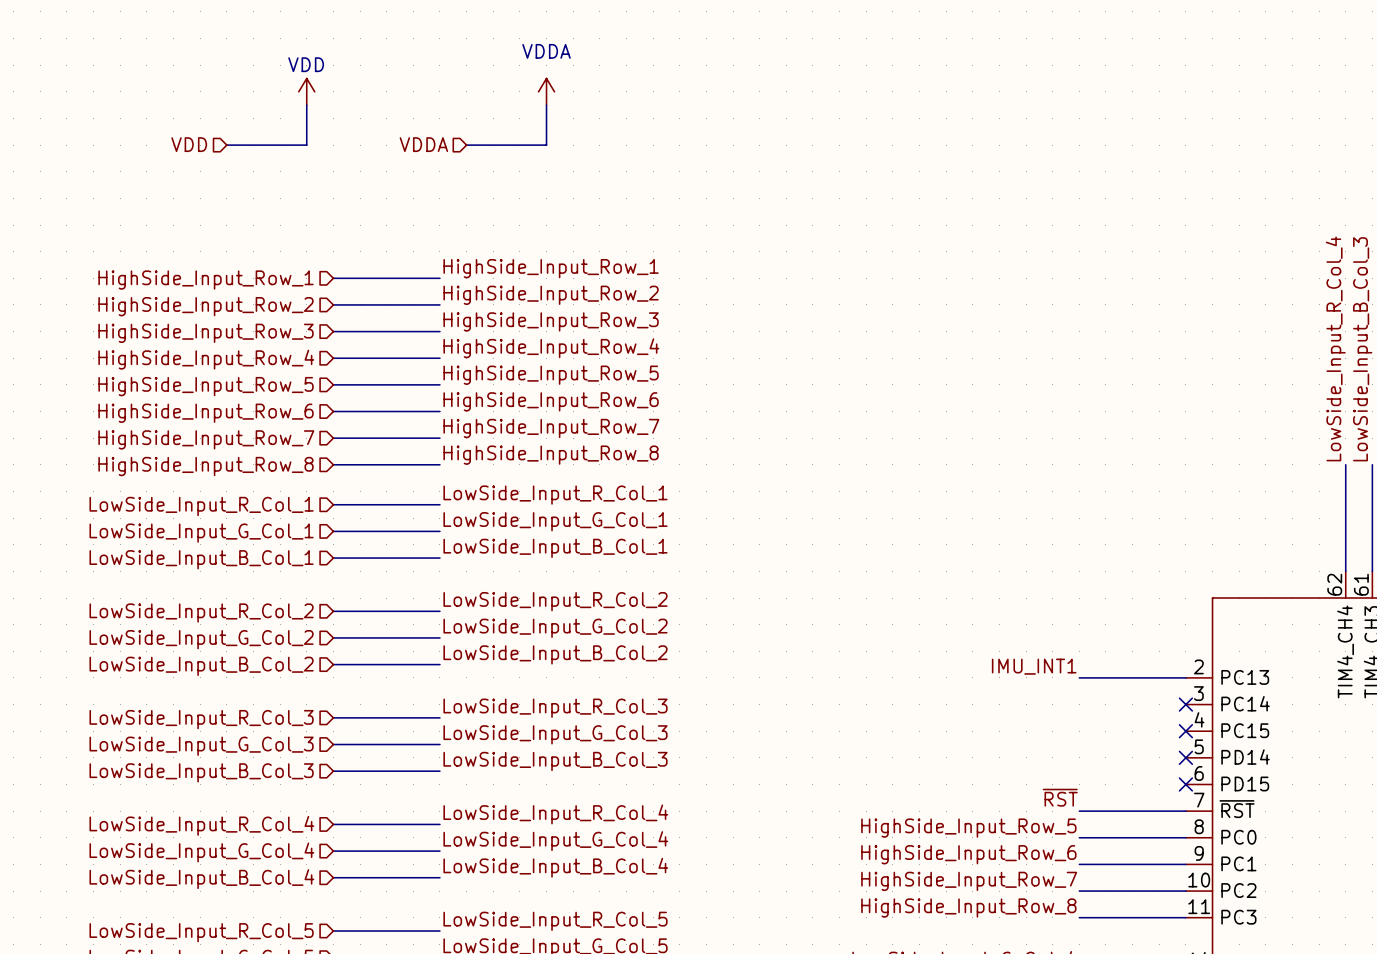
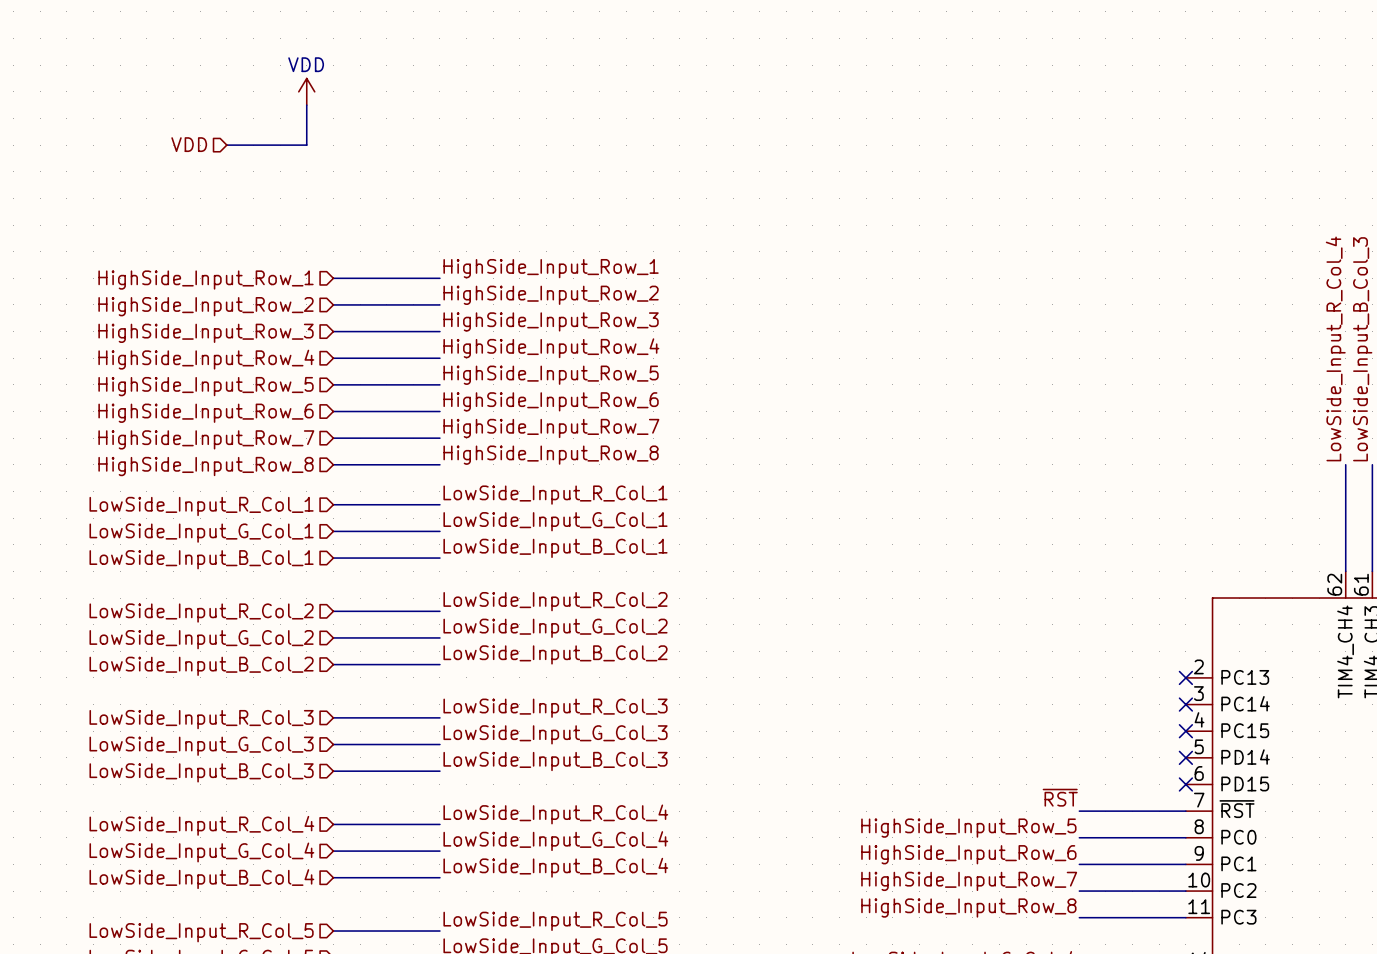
power symbol: VDDA (546, 91) -> none
wire: (546, 105) (546, 145) (466, 145) -> none
hierarchical label: VDDA (423, 144) -> none
label: IMU_INT1 (1034, 666) -> none
wire: (1079, 677) (1185, 677) -> none
no-connect mark: none -> (1185, 677)

